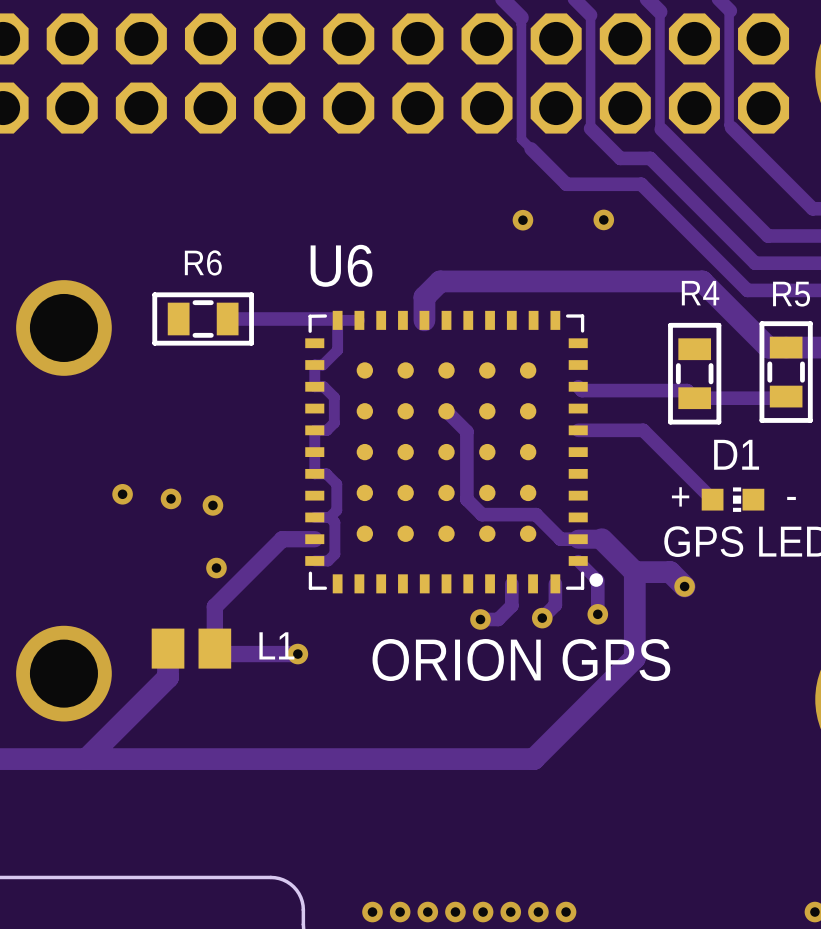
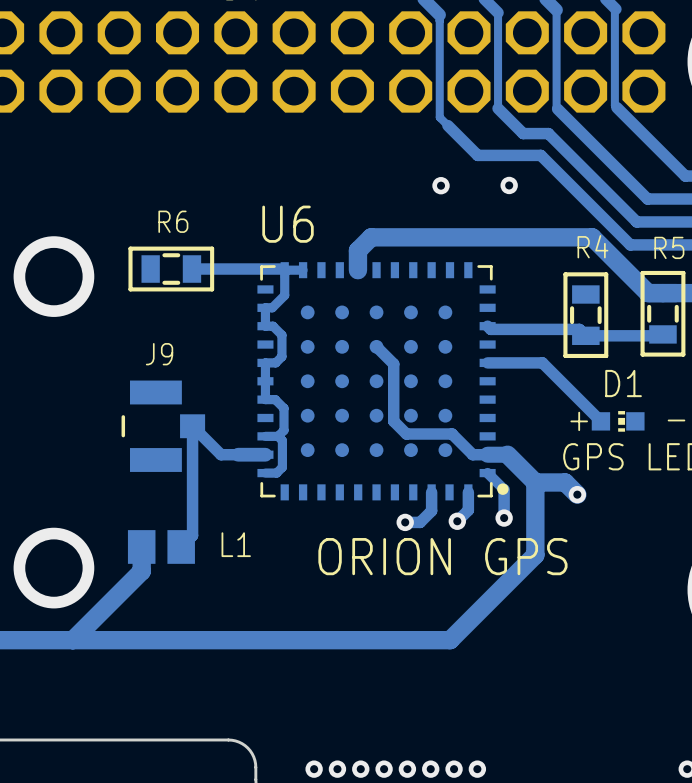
via: (122, 494) -> none
via: (171, 498) -> none
J9: none -> (163, 426)
via: (212, 505) -> none
track: (282, 539) (214, 606) (214, 648) (220, 654) (297, 654) -> (238, 454) (221, 454) (192, 426) (192, 535) (181, 546)
via: (216, 568) -> none
via: (297, 654) -> none

